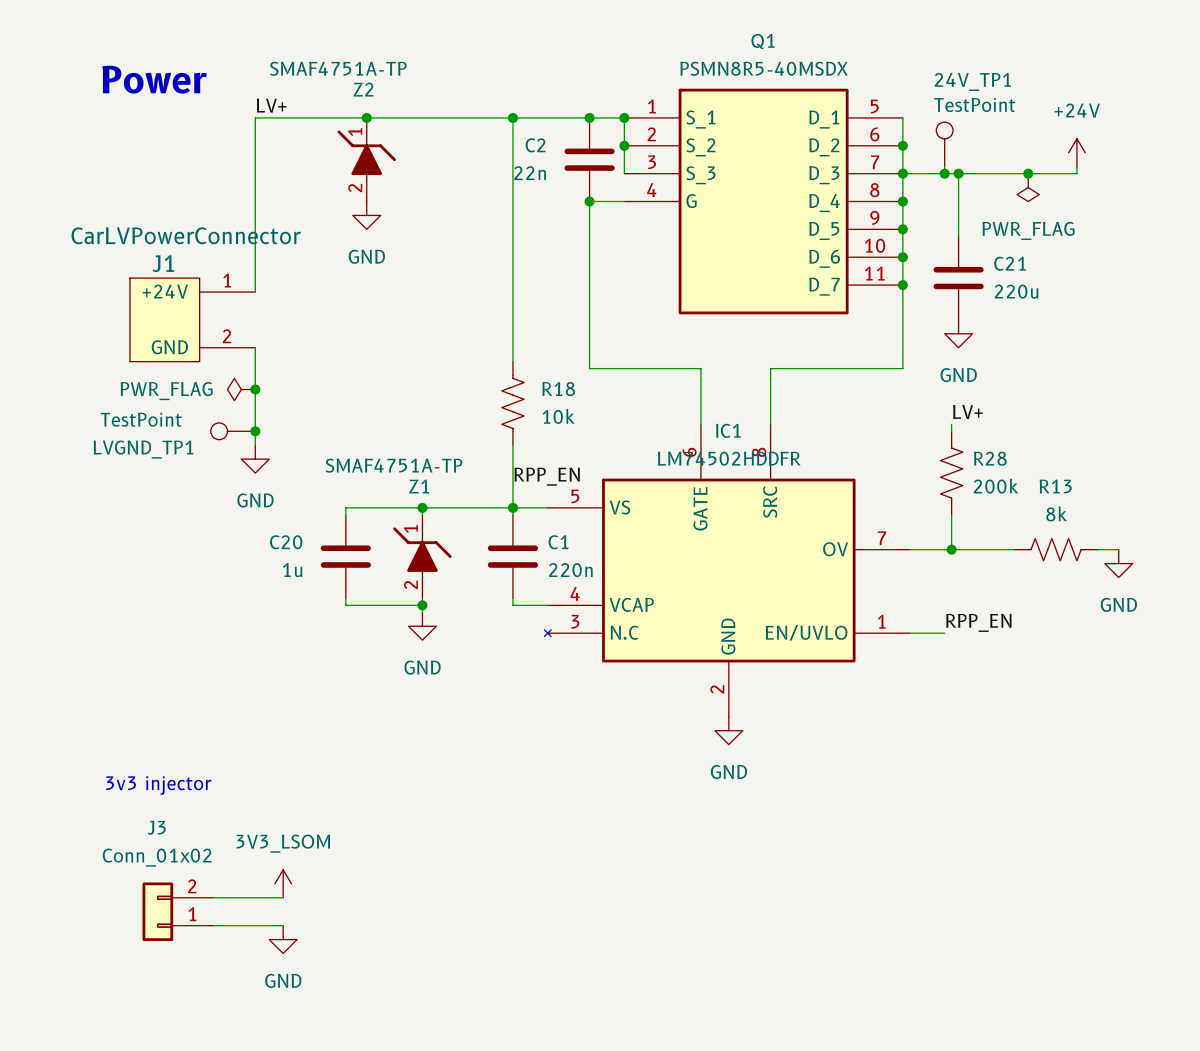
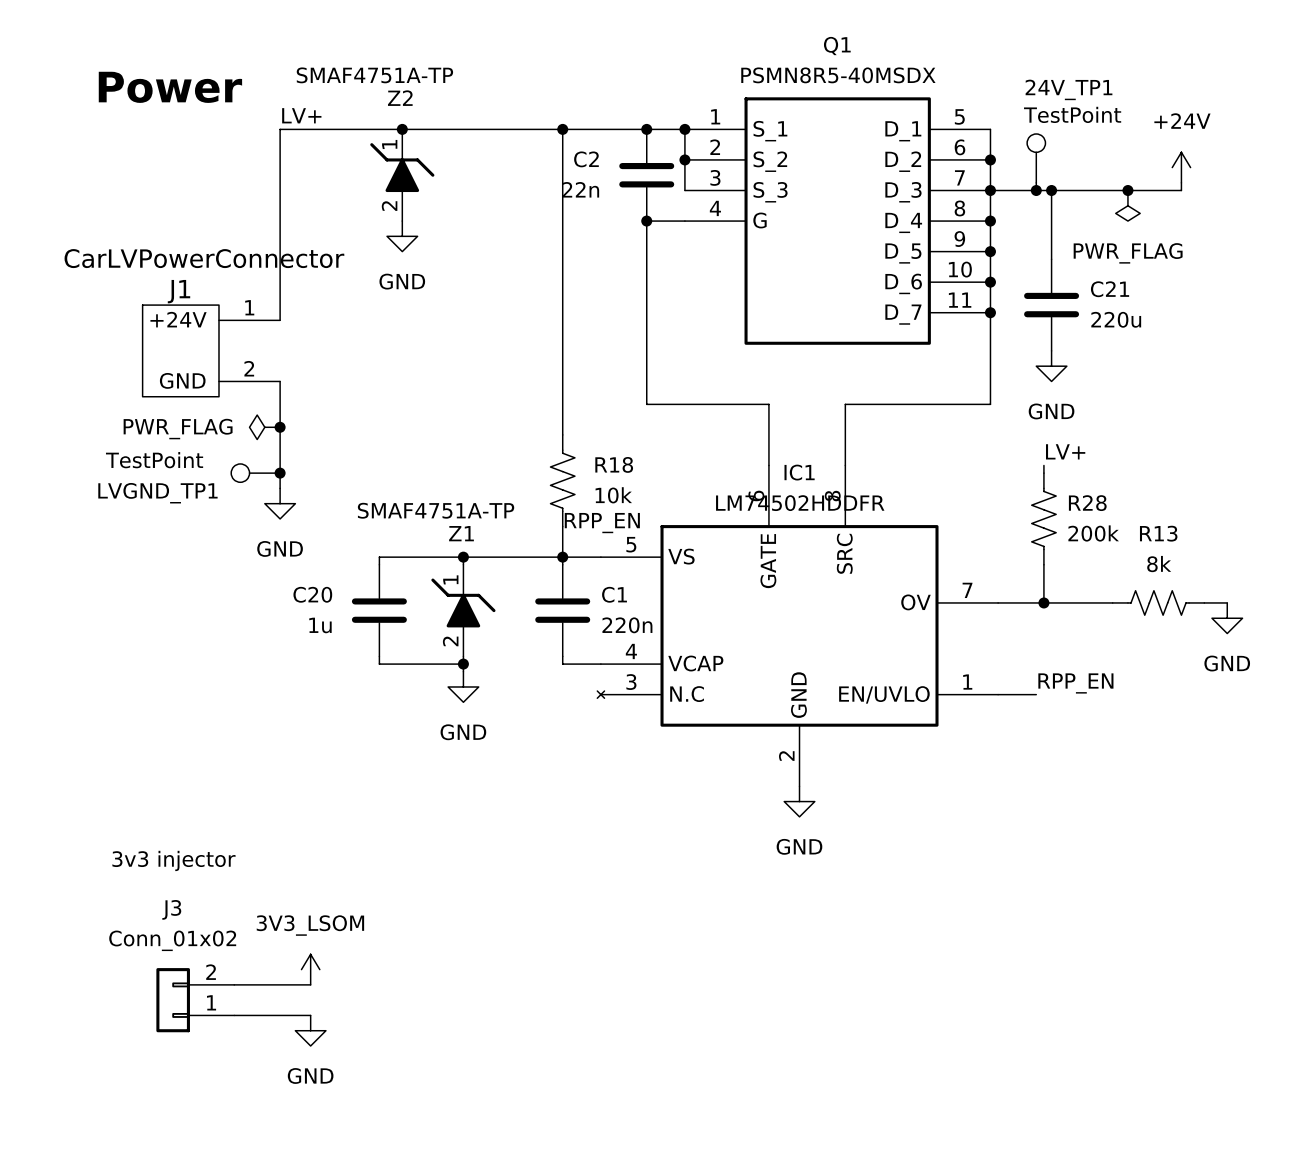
R18 position: (512, 403) -> (562, 480)

